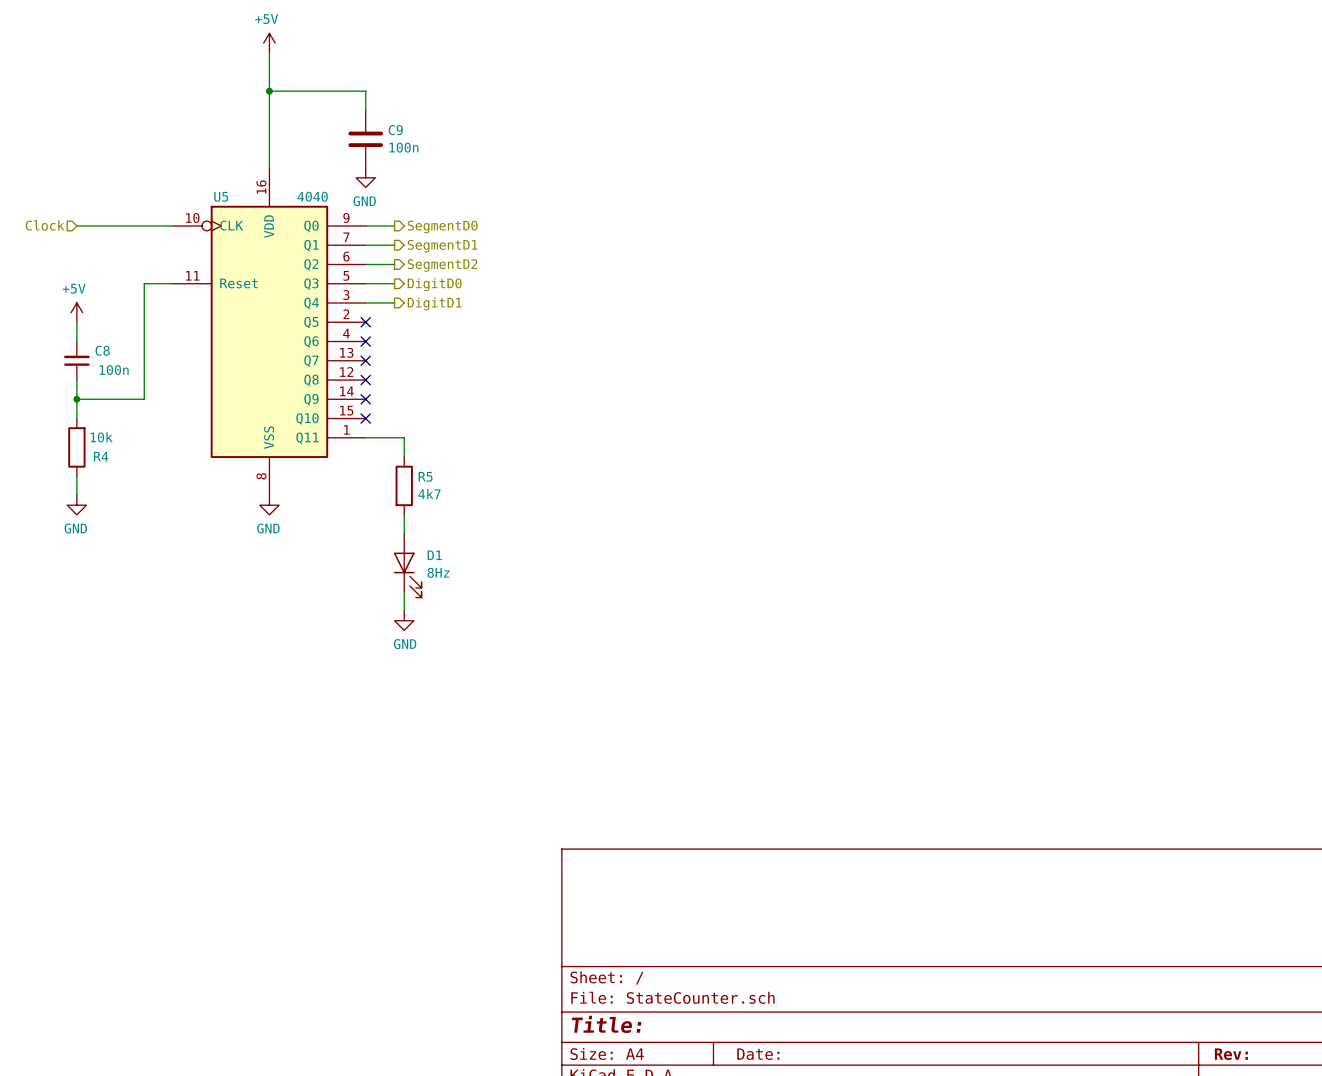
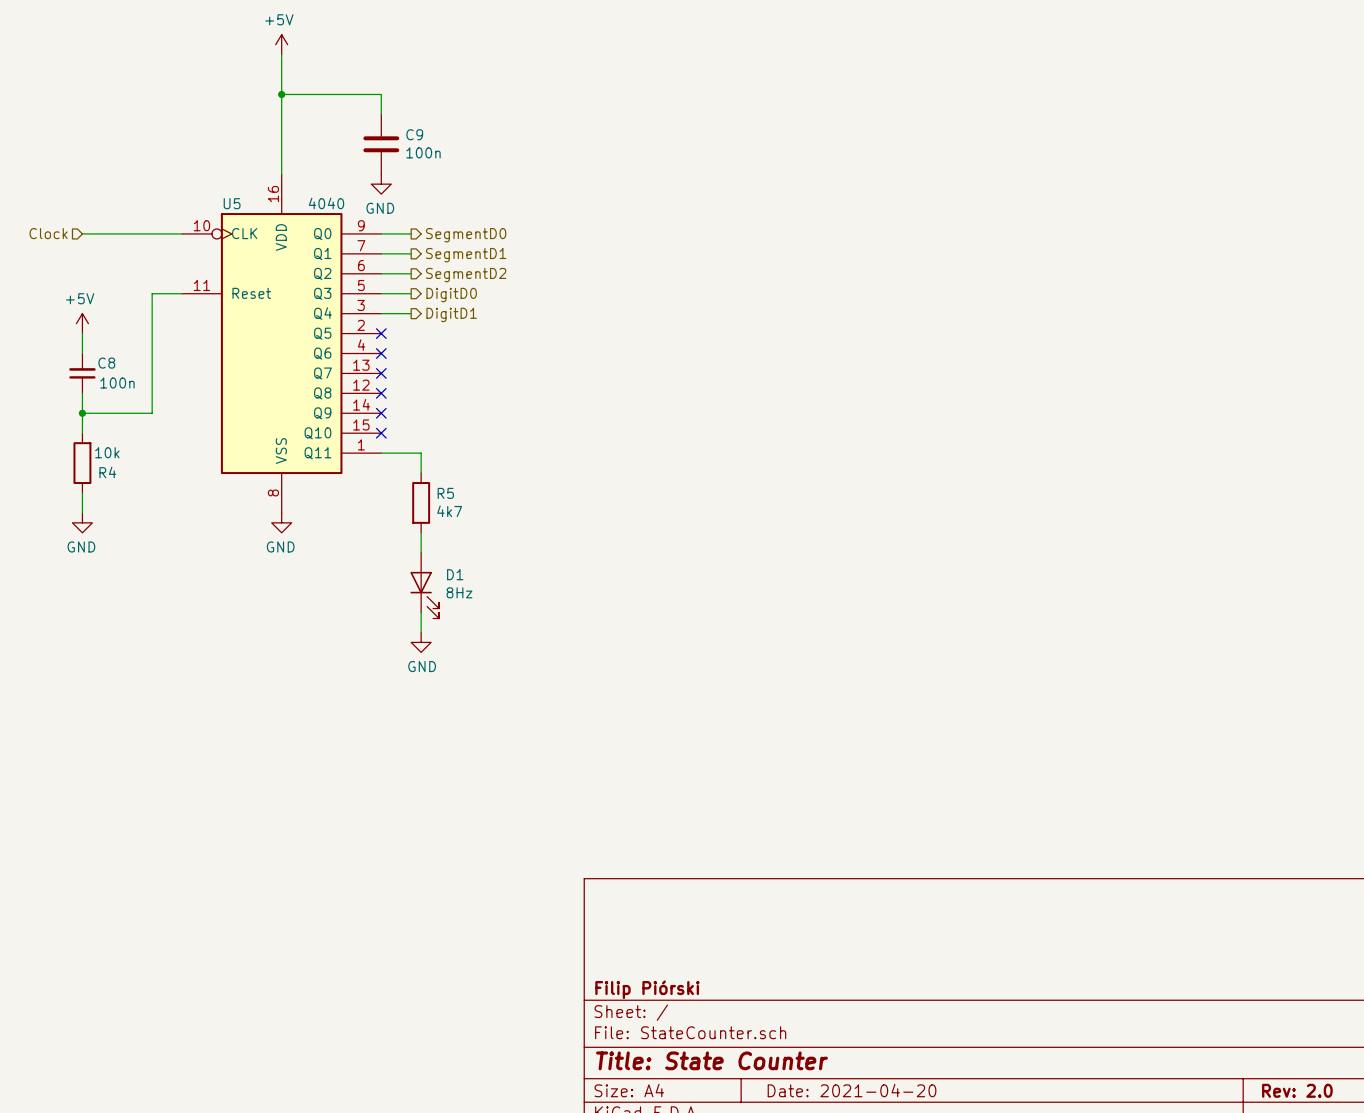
title block: none -> Filip Piórski (647, 989)
title block: Title: (606, 1024) -> Title: State Counter (711, 1060)
title block: Date: (758, 1054) -> Date: 2021-04-20 (852, 1090)
title block: Rev: (1231, 1054) -> Rev: 2.0 (1297, 1090)

